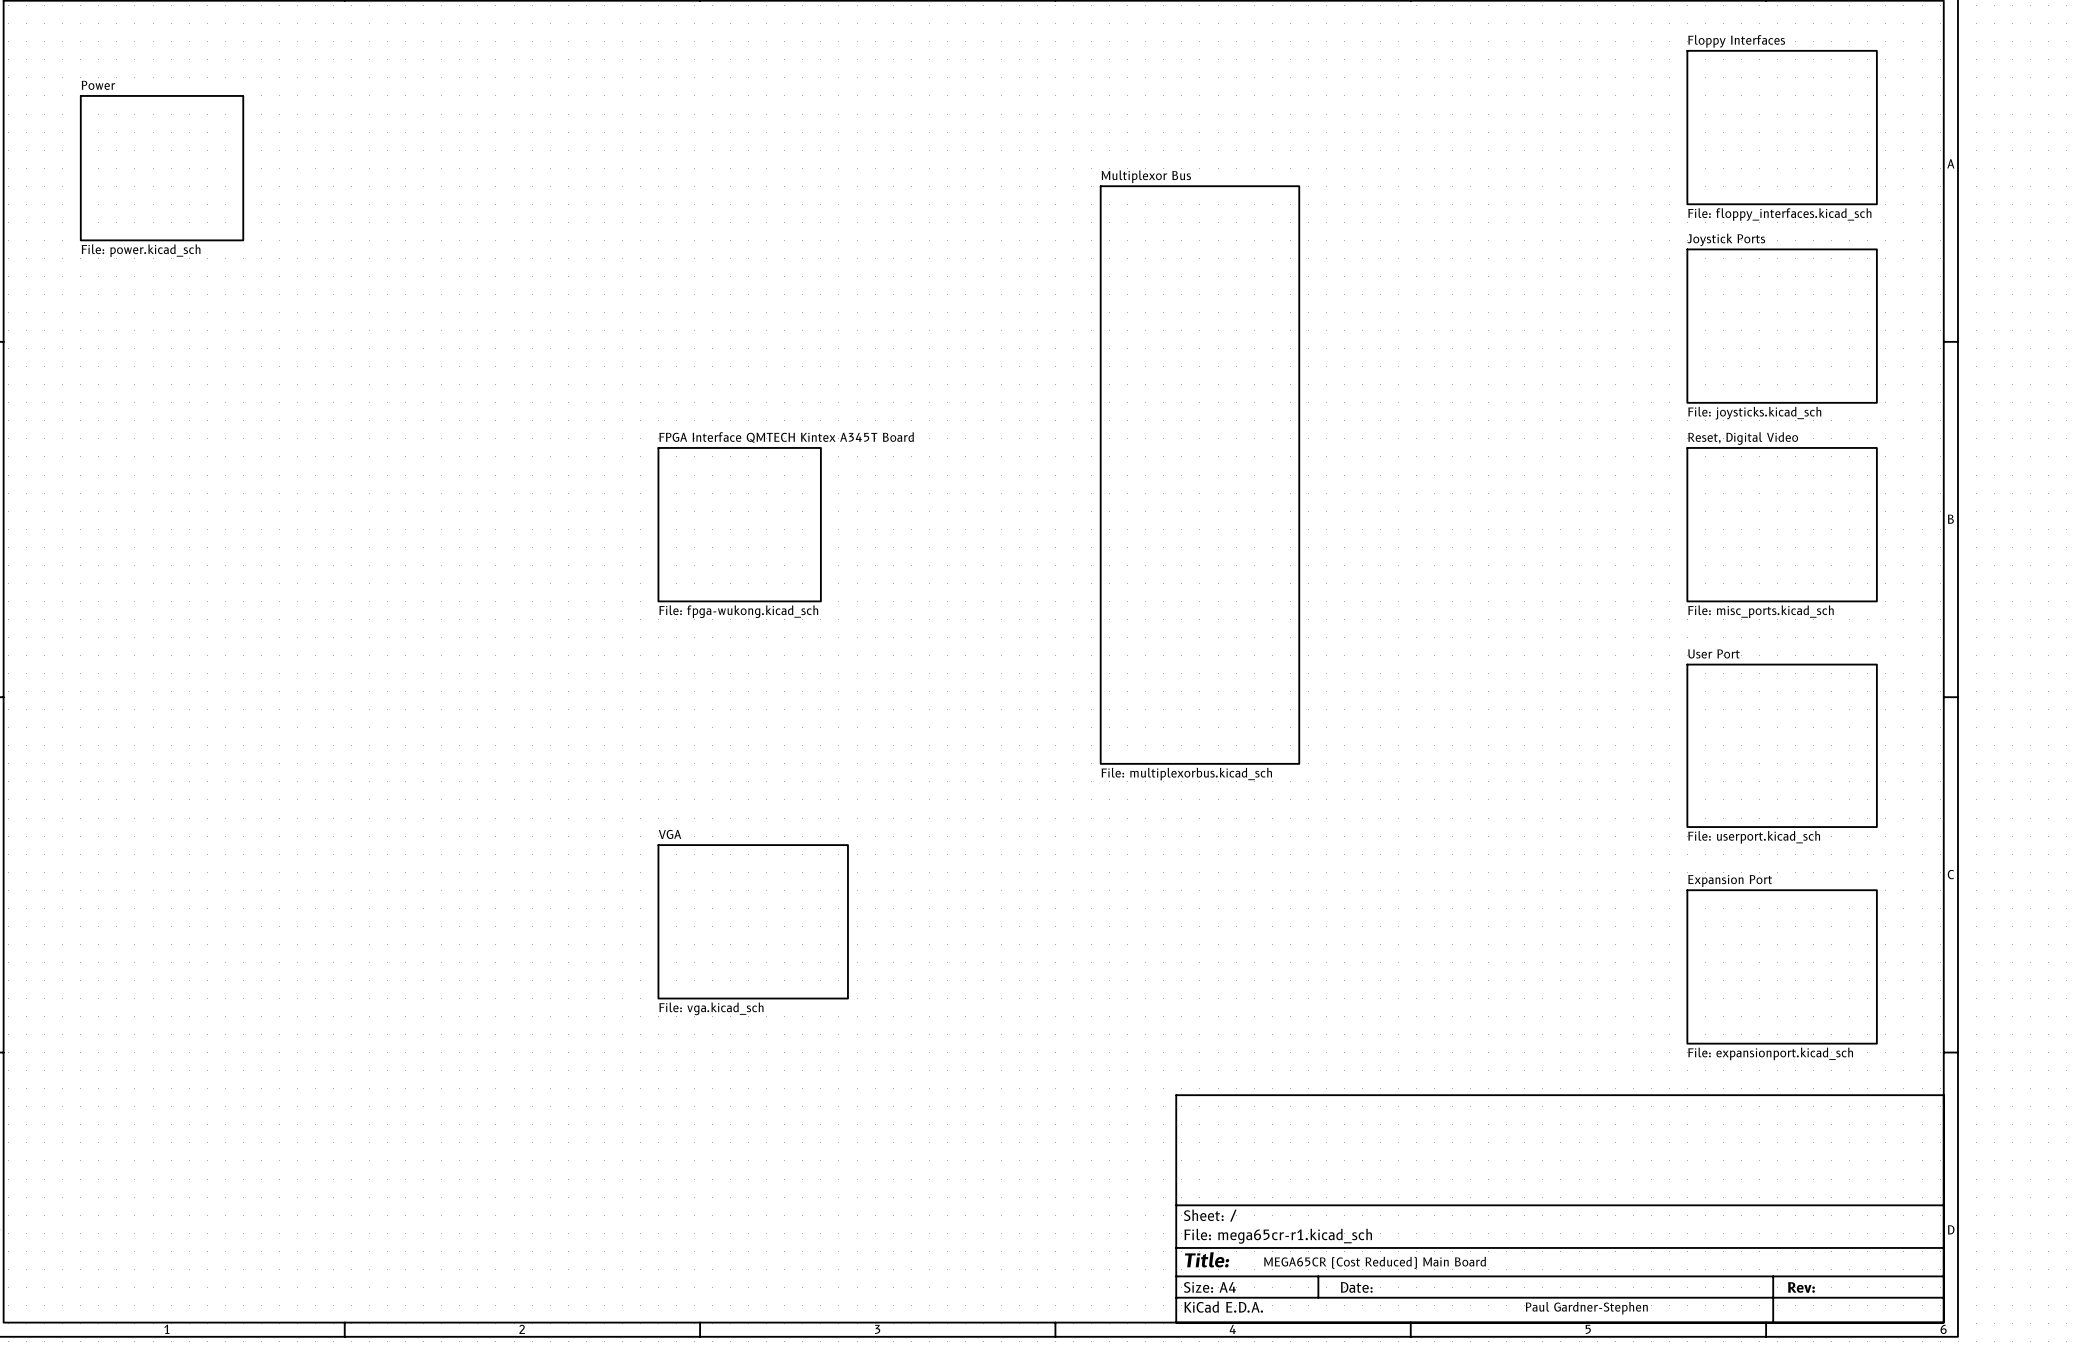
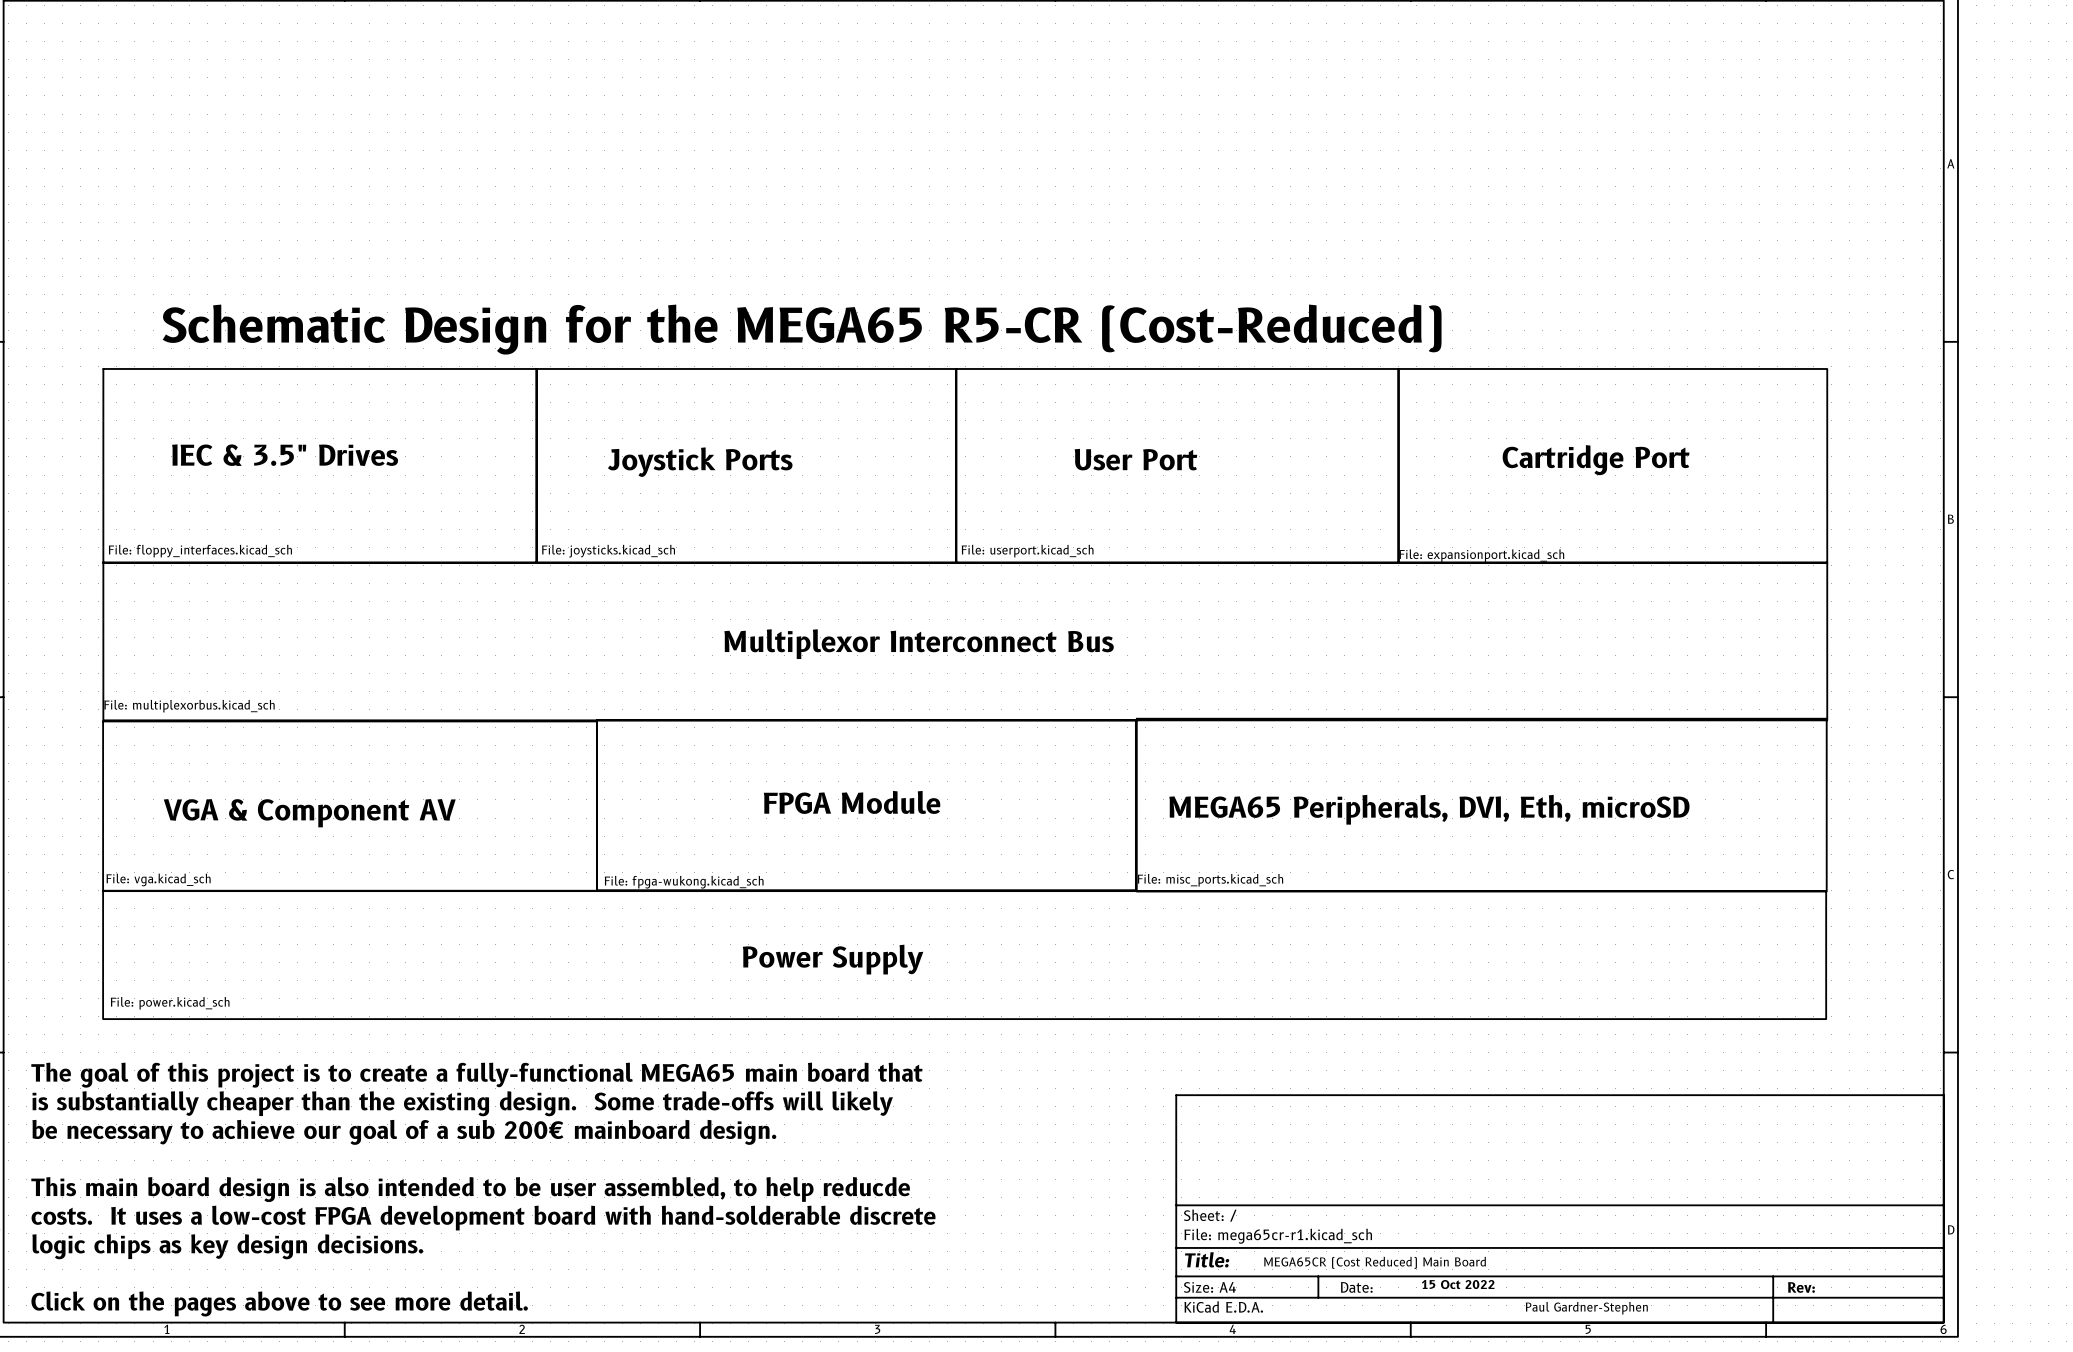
sheet Floppy Interfaces: File: floppy_interfaces.kicad_sch (1782, 127) -> none
sheet Power: File: power.kicad_sch (162, 168) -> none
sheet Joystick Ports: File: joysticks.kicad_sch (1782, 326) -> none
text: none -> Schematic Design for the MEGA65 R5-CR (Cost-Reduced) (802, 329)
sheet IEC & 3.5" Drives: none -> File: floppy_interfaces.kicad_sch (319, 466)
sheet Joystick Ports: none -> File: joysticks.kicad_sch (746, 466)
sheet User Port: none -> File: userport.kicad_sch (1177, 466)
sheet Cartridge Port: none -> File: expansionport.kicad_sch (1612, 466)
sheet Multiplexor Bus: File: multiplexorbus.kicad_sch (1199, 475) -> none
sheet FPGA Interface QMTECH Kintex A345T Board: File: fpga-wukong.kicad_sch (739, 524) -> none
sheet Reset, Digital Video: File: misc_ports.kicad_sch (1782, 524) -> none
sheet Multiplexor Interconnect Bus: none -> File: multiplexorbus.kicad_sch (965, 641)
sheet User Port: File: userport.kicad_sch (1782, 745) -> none
sheet FPGA Module: none -> File: fpga-wukong.kicad_sch (866, 805)
sheet MEGA65 Peripherals, DVI, Eth, microSD: none -> File: misc_ports.kicad_sch (1481, 805)
sheet VGA & Component AV: none -> File: vga.kicad_sch (350, 806)
sheet VGA: File: vga.kicad_sch (753, 921) -> none
sheet Power Supply: none -> File: power.kicad_sch (964, 955)
sheet Expansion Port: File: expansionport.kicad_sch (1782, 966) -> none
text: none -> The goal of this project is to create a fully-functional MEGA65 main board that (476, 1075)
text: none -> is substantially cheaper than the existing design. Some trade-offs will likely (462, 1103)
text: none -> be necessary to achieve our goal of a sub 200€ mainboard design. (404, 1132)
text: none -> This main board design is also intended to be user assembled, to help reducde (470, 1189)
text: none -> costs. It uses a low-cost FPGA development board with hand-solderable discrete (483, 1218)
text: none -> logic chips as key design decisions. (227, 1246)
text: none -> 15 Oct 2022 (1458, 1284)
text: none -> Click on the pages above to see more detail. (279, 1303)

